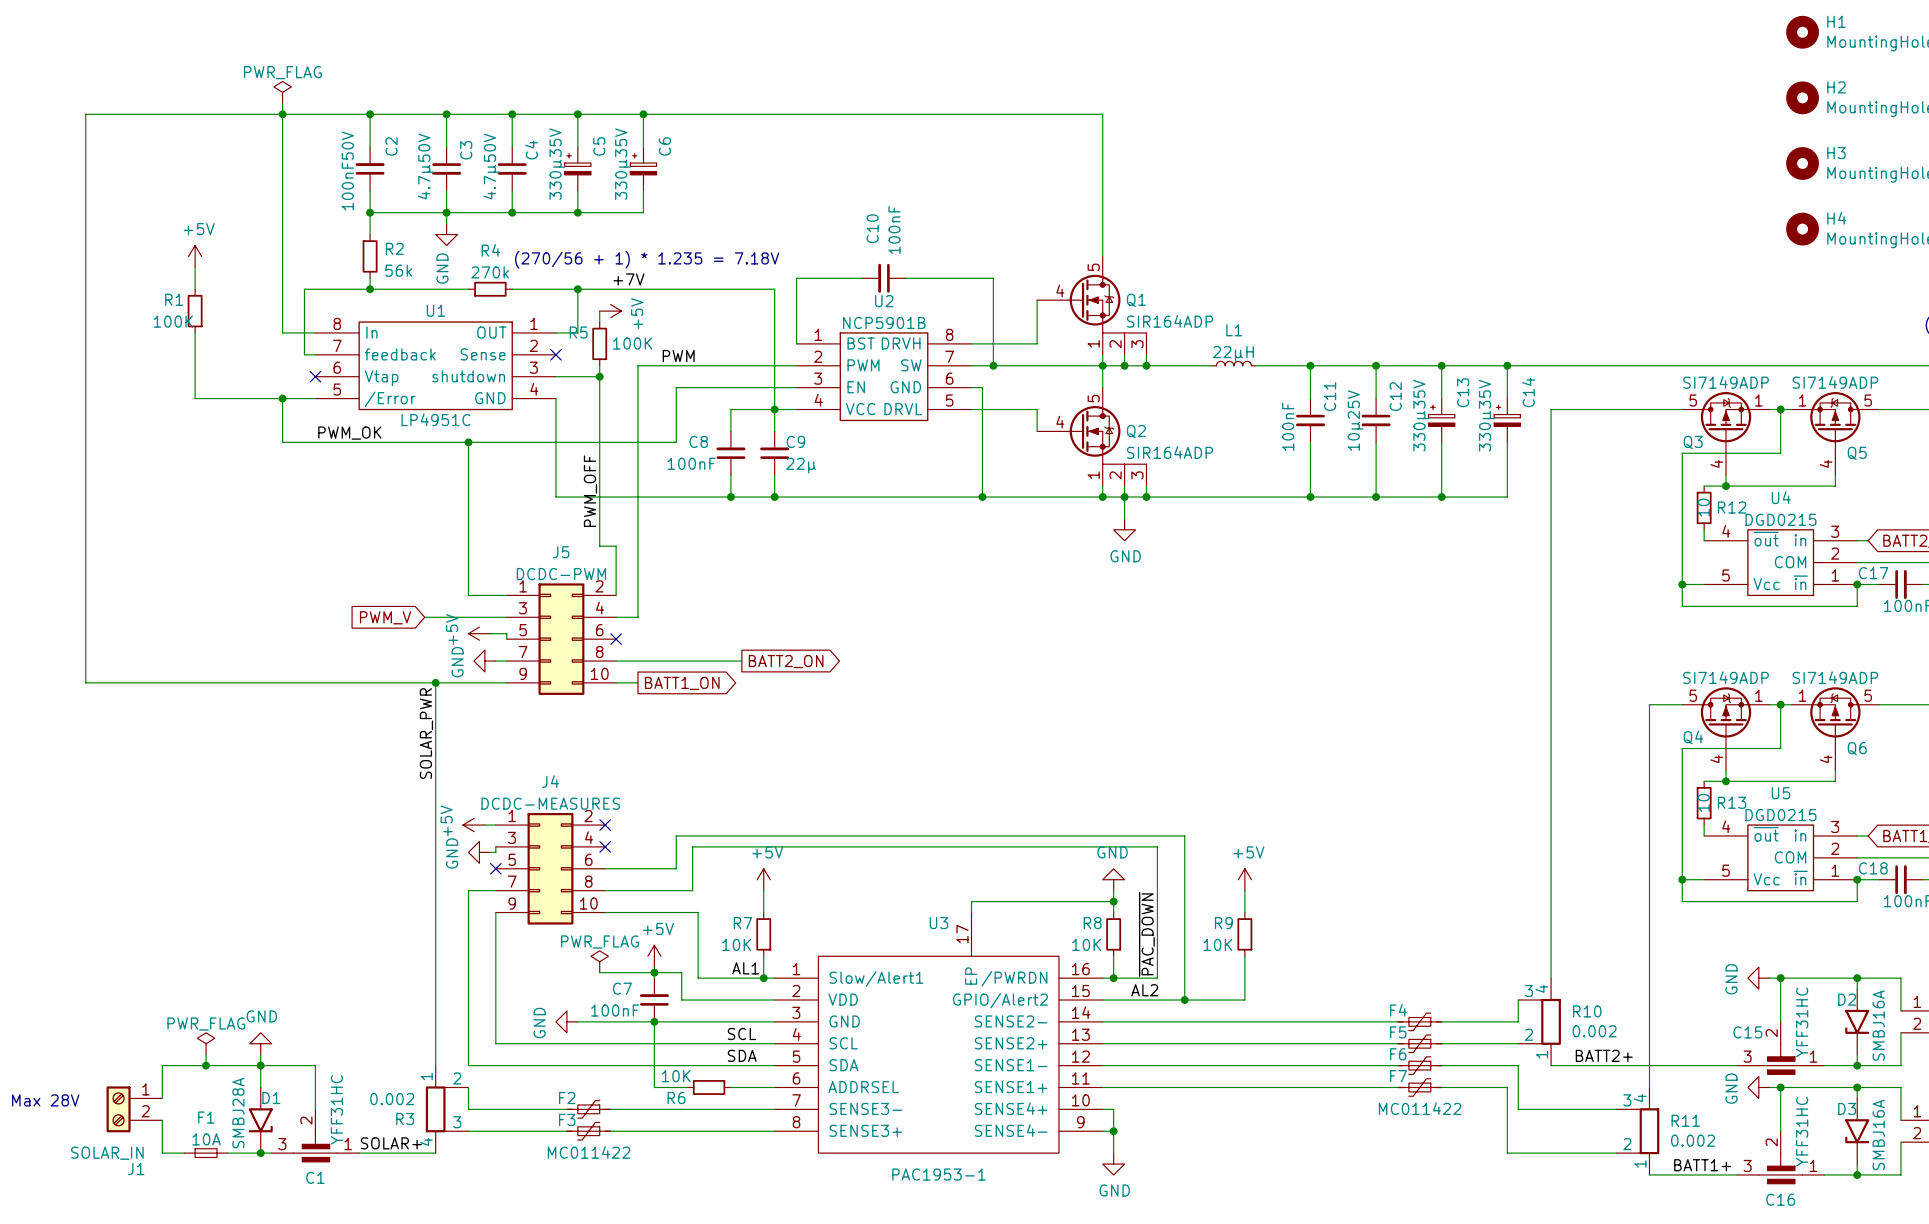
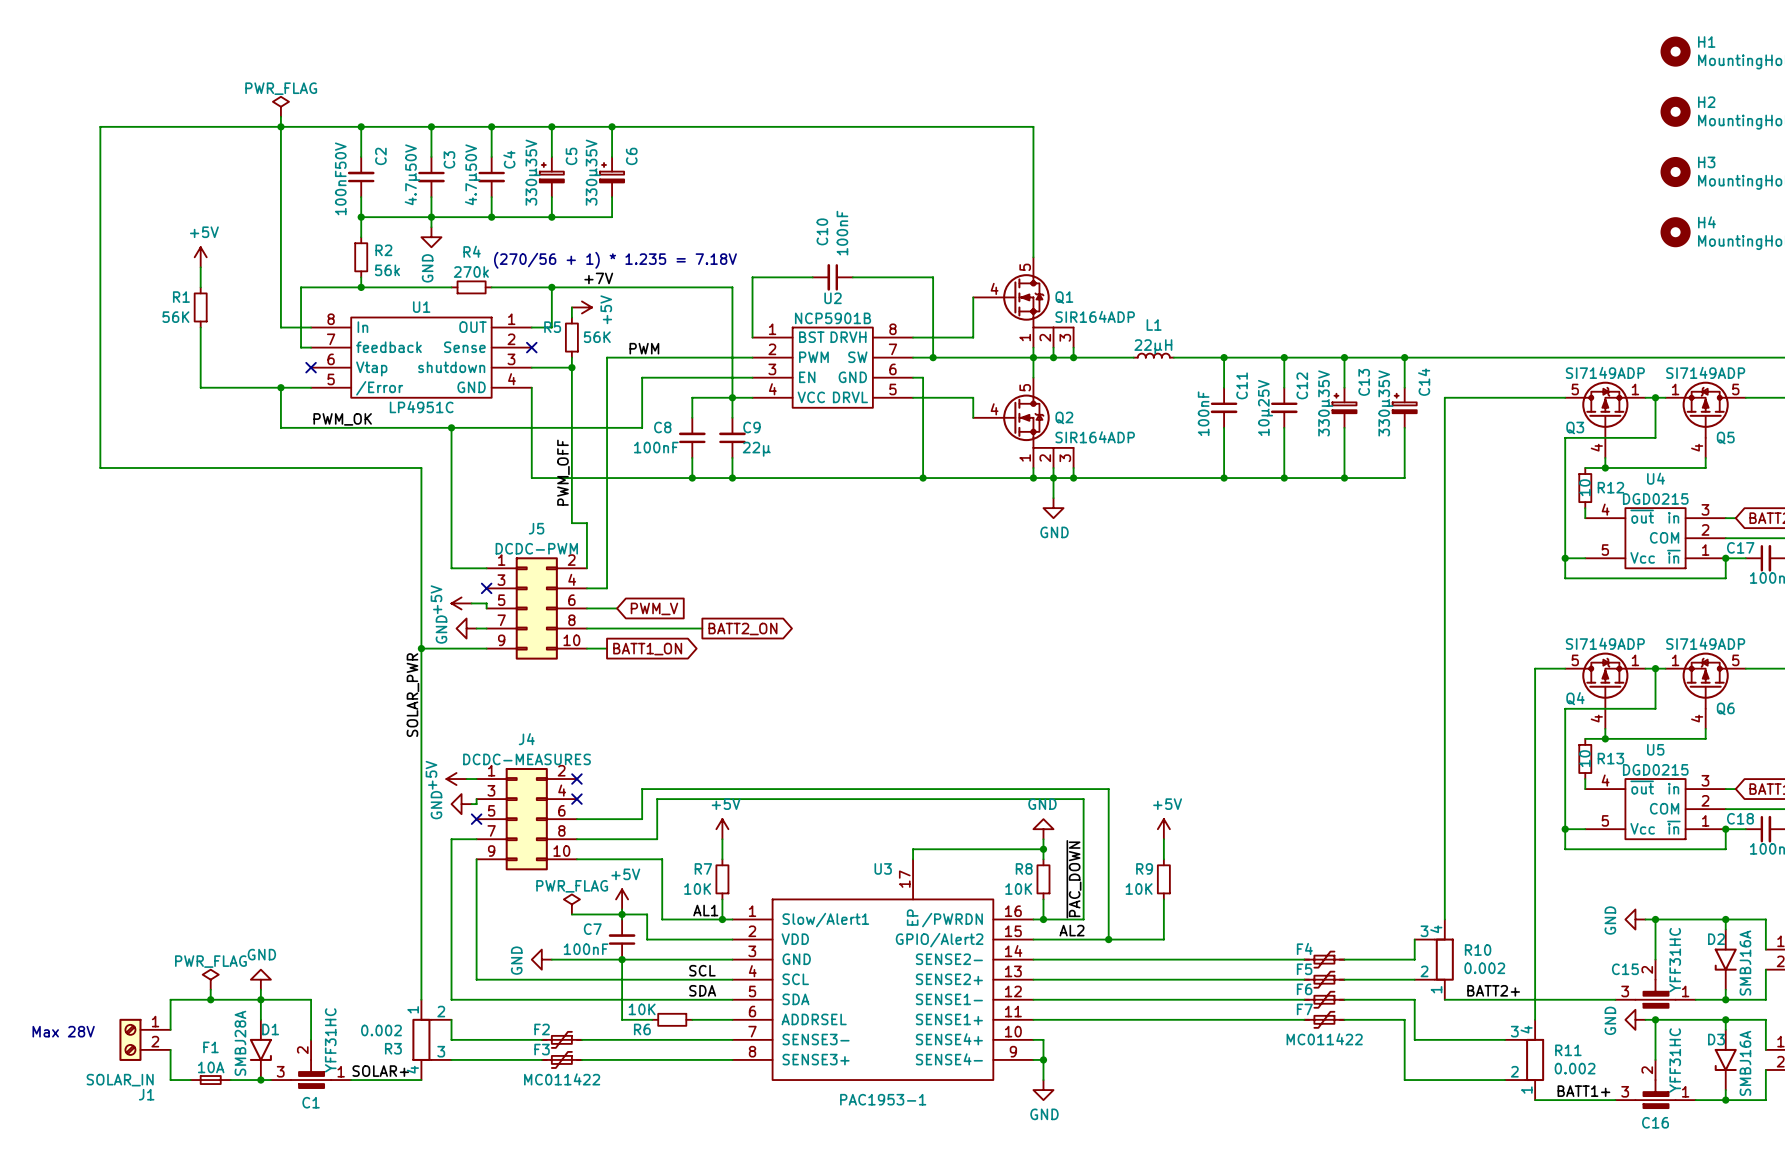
R1 value: 100K (173, 321) -> 56K (175, 317)
R5 value: 100K (632, 343) -> 56K (597, 337)
wire: (85, 486) (85, 682) (435, 682) -> (100, 467) (421, 467) (421, 648)
global label: PWM_V (385, 617) -> none
wire: (424, 617) (506, 617) -> none
no-connect mark: none -> (486, 588)
wire: none -> (586, 608) (617, 608)
no-connect mark: (616, 639) -> none
global label: none -> PWM_V (654, 608)

